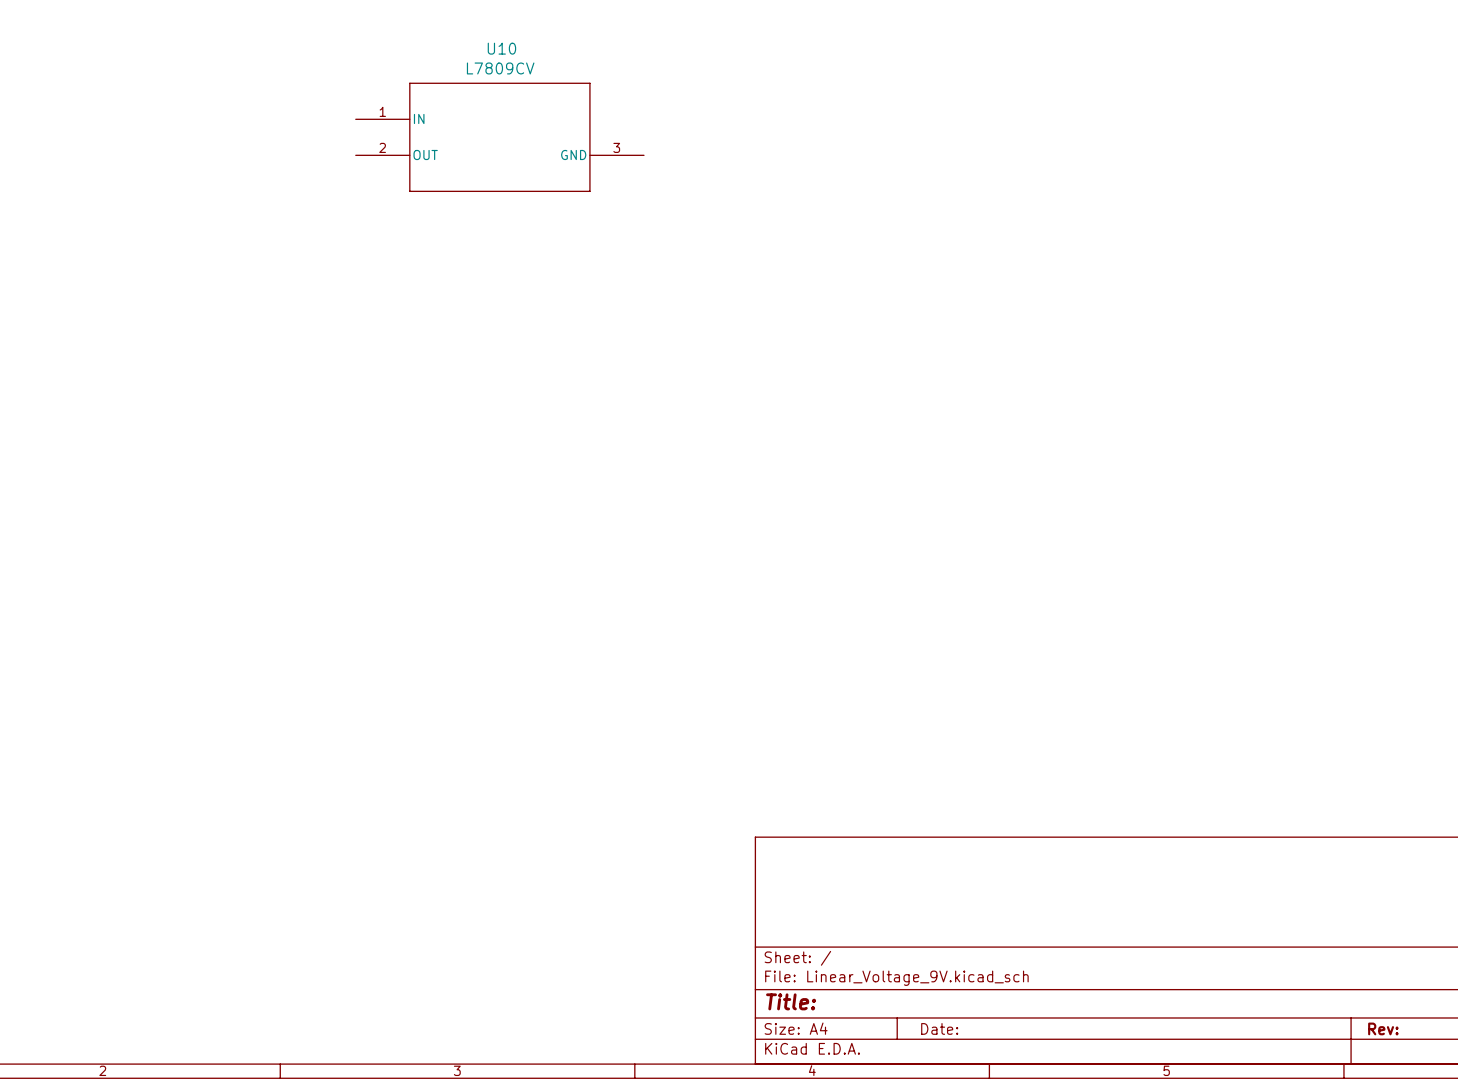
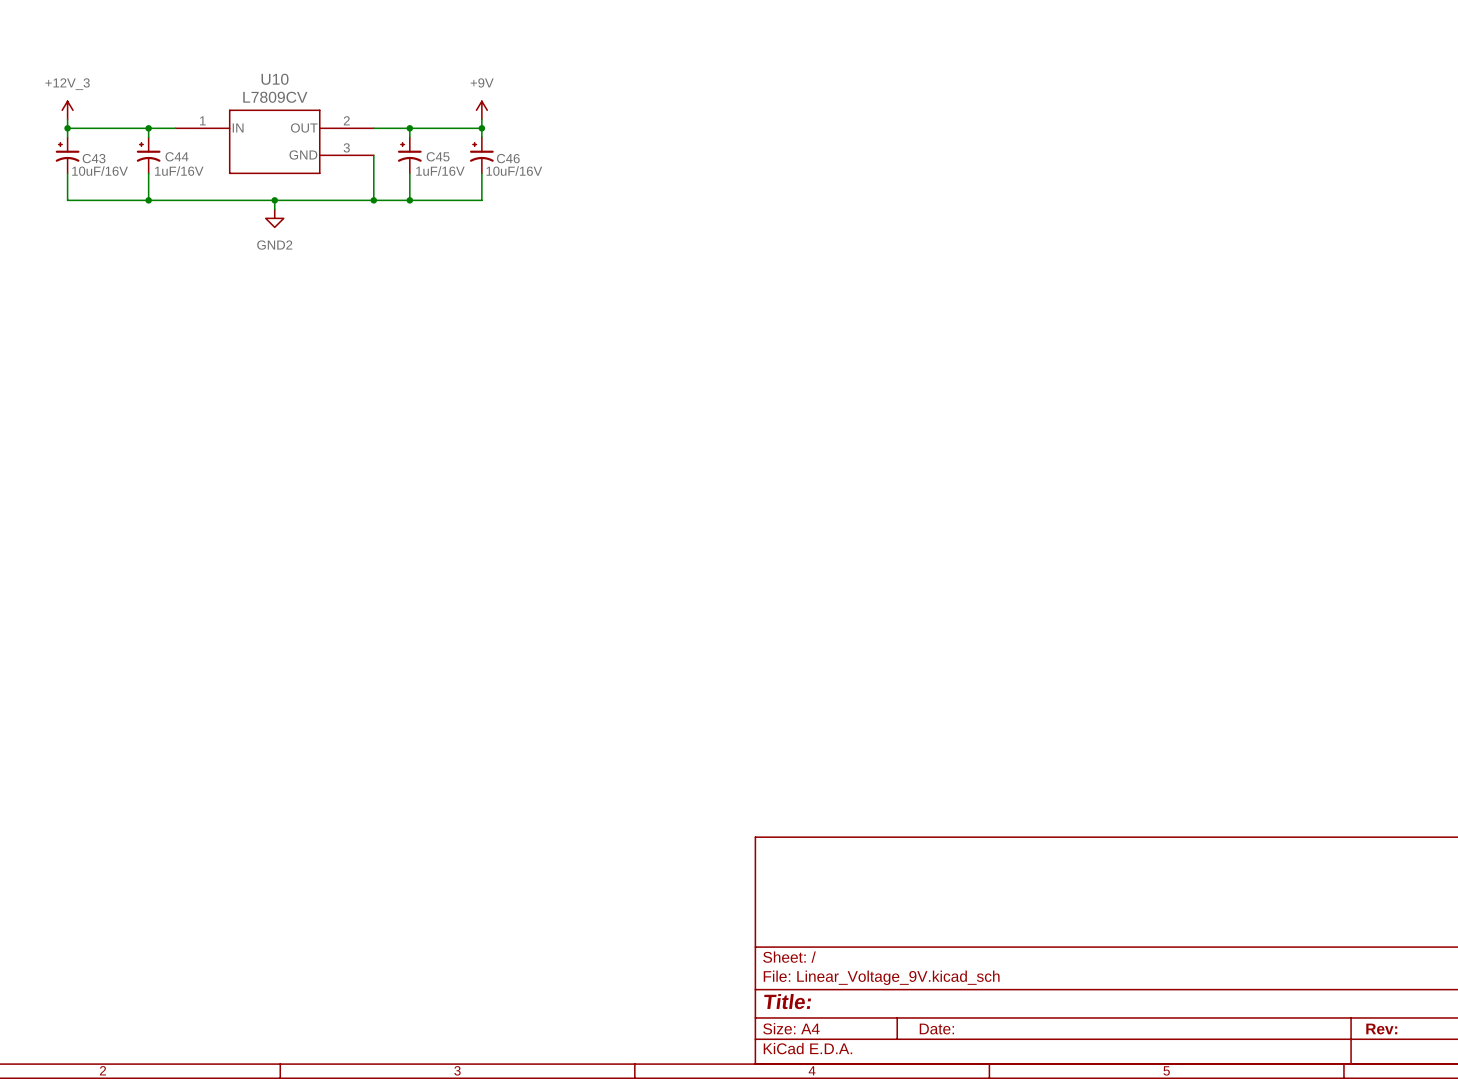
U10 name position: U10 (501, 48) -> U10 (275, 79)
U10 value position: L7809CV (500, 68) -> L7809CV (275, 97)
U10 symbol: [355, 82, 644, 192] -> [175, 109, 374, 174]
power symbol: none -> +12V_3 (67, 110)
power symbol: none -> +9V (481, 110)
wire: none -> (67, 119) (67, 137)
wire: none -> (481, 119) (481, 137)
wire: none -> (67, 128) (175, 128)
junction: none -> (67, 128)
wire: none -> (148, 128) (148, 137)
junction: none -> (148, 128)
wire: none -> (373, 128) (481, 128)
junction: none -> (409, 128)
junction: none -> (481, 128)
C43: none -> 10uF/16V (67, 155)
C44: none -> 1uF/16V (148, 155)
wire: none -> (373, 155) (373, 200)
C45: none -> 1uF/16V (409, 155)
C46: none -> 10uF/16V (481, 155)
wire: none -> (67, 173) (67, 200) (481, 200) (481, 173)
wire: none -> (148, 173) (148, 200)
junction: none -> (148, 200)
wire: none -> (274, 200) (274, 209)
junction: none -> (274, 200)
junction: none -> (373, 200)
junction: none -> (409, 200)
power symbol: none -> GND2 (274, 218)

